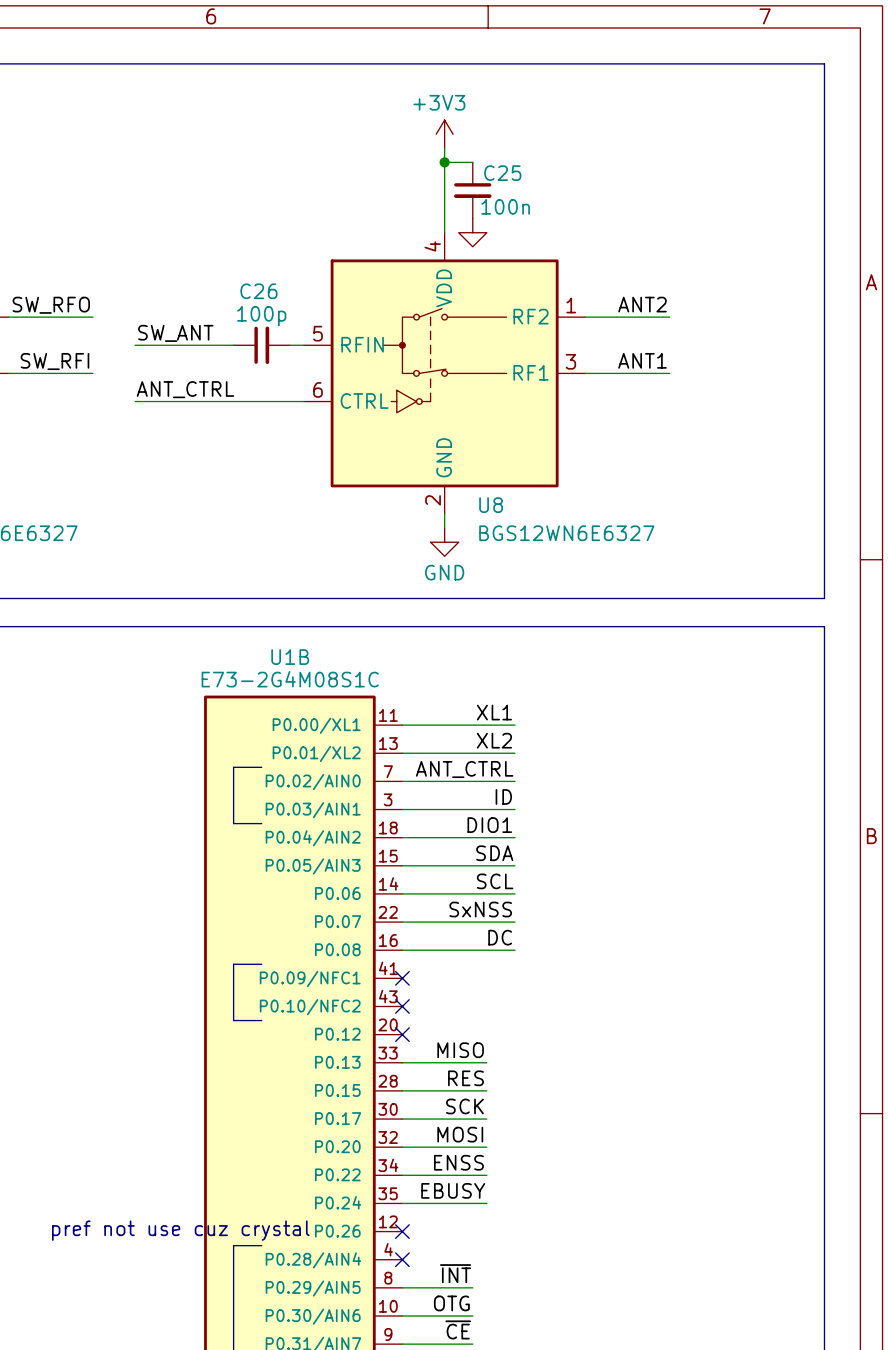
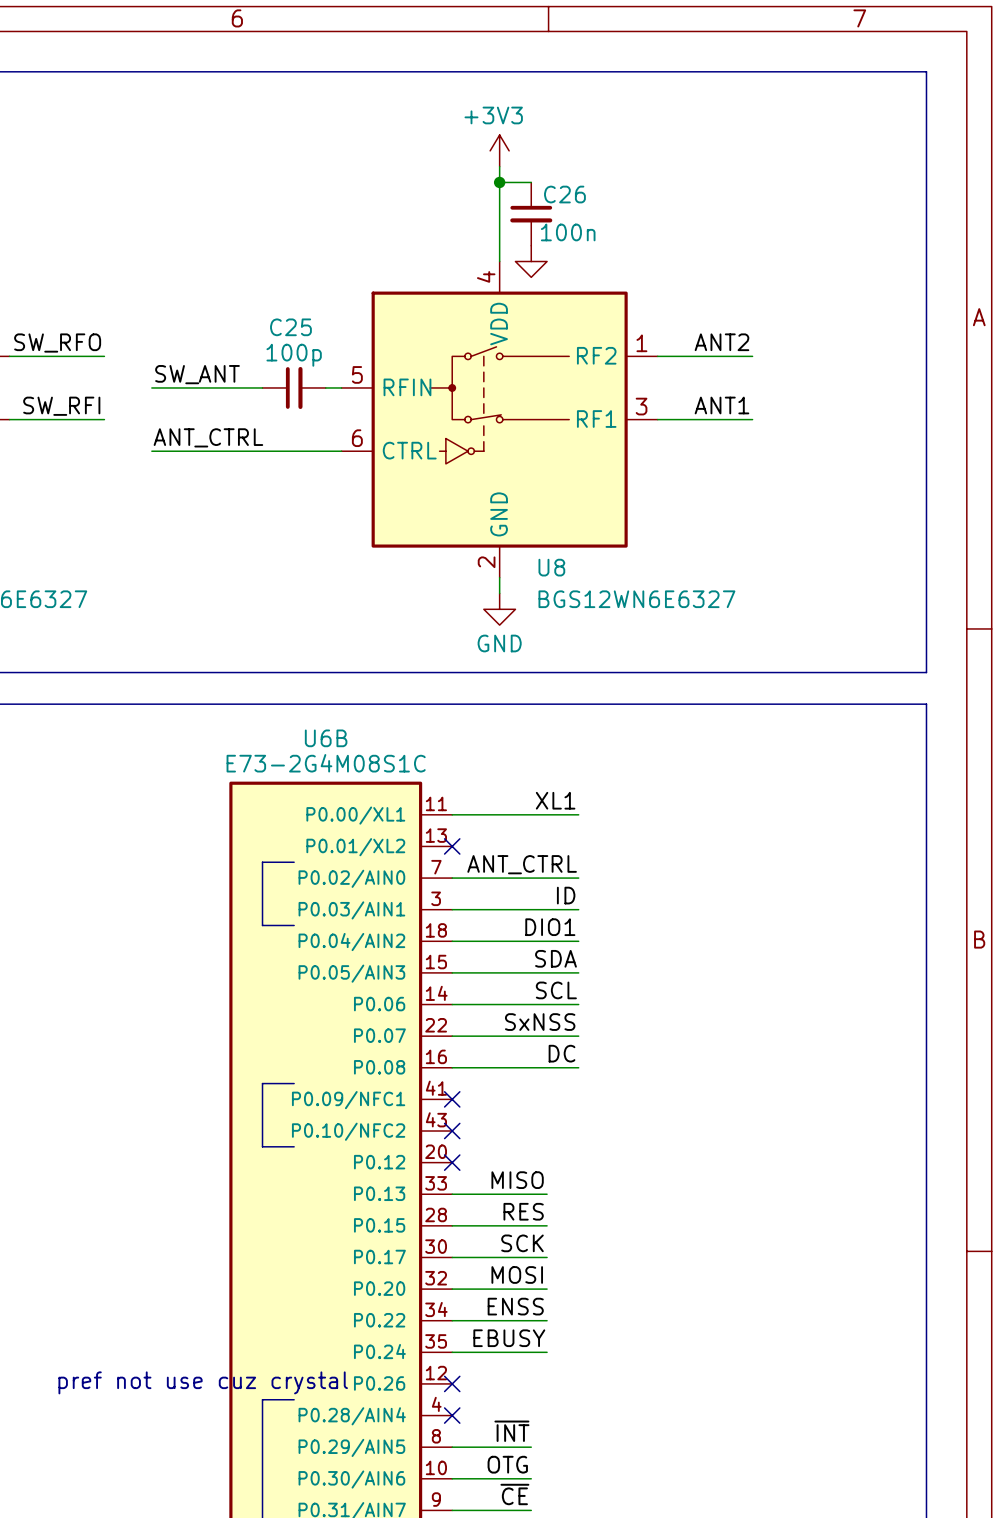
C25 name: C25 (502, 173) -> C26 (564, 194)
C26 name: C26 (258, 291) -> C25 (290, 327)
U1B name: U1B (290, 657) -> U6B (326, 738)
label: XL2 (494, 740) -> none
wire: (402, 753) (514, 753) -> none
no-connect mark: none -> (452, 846)

